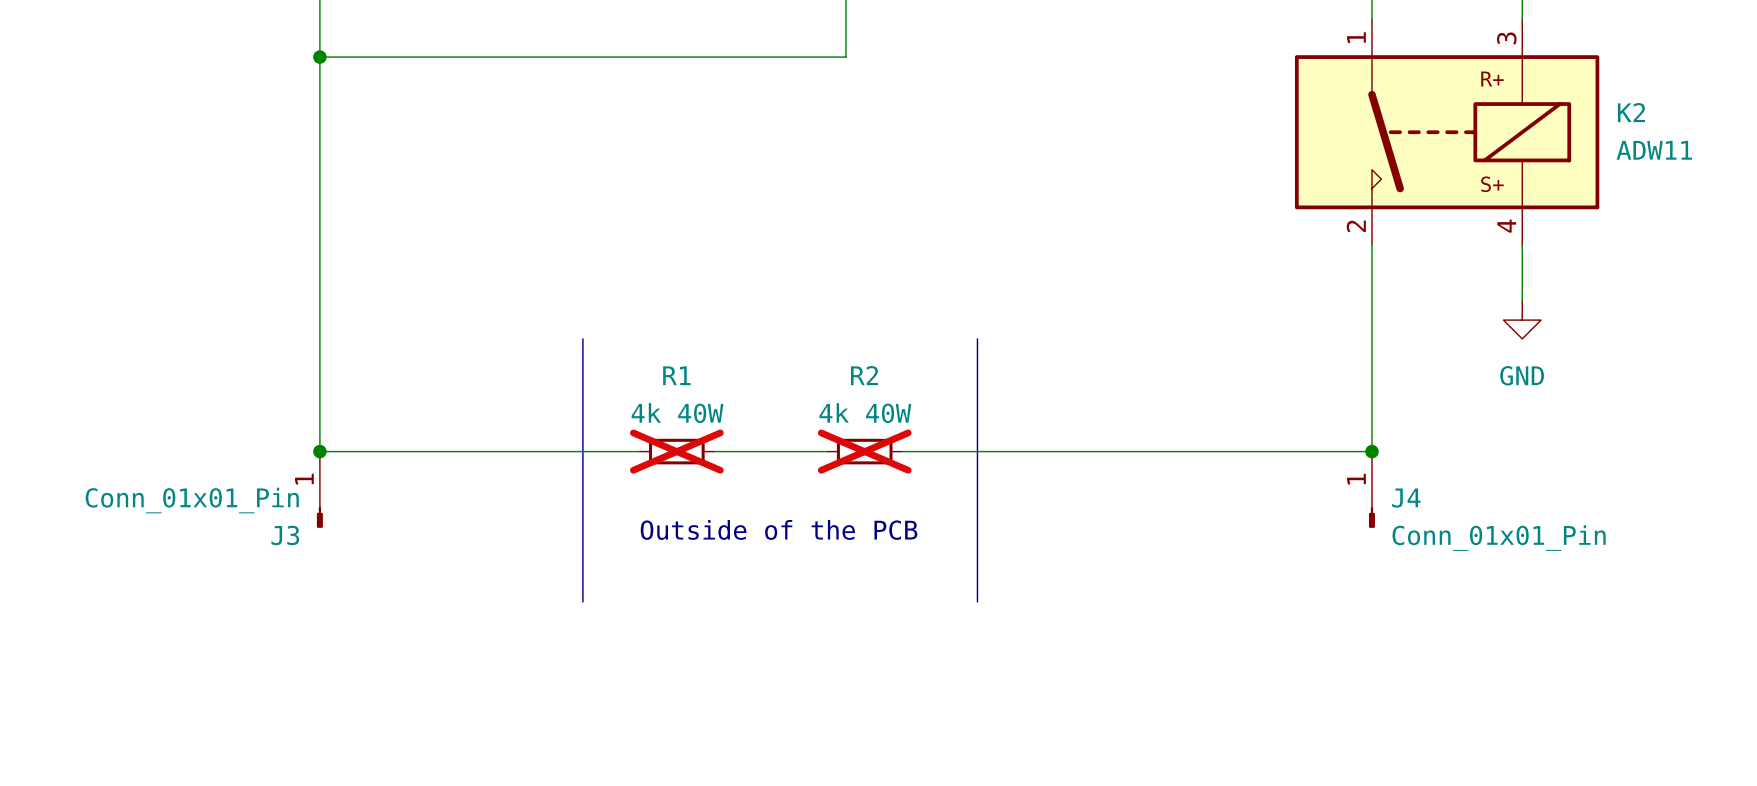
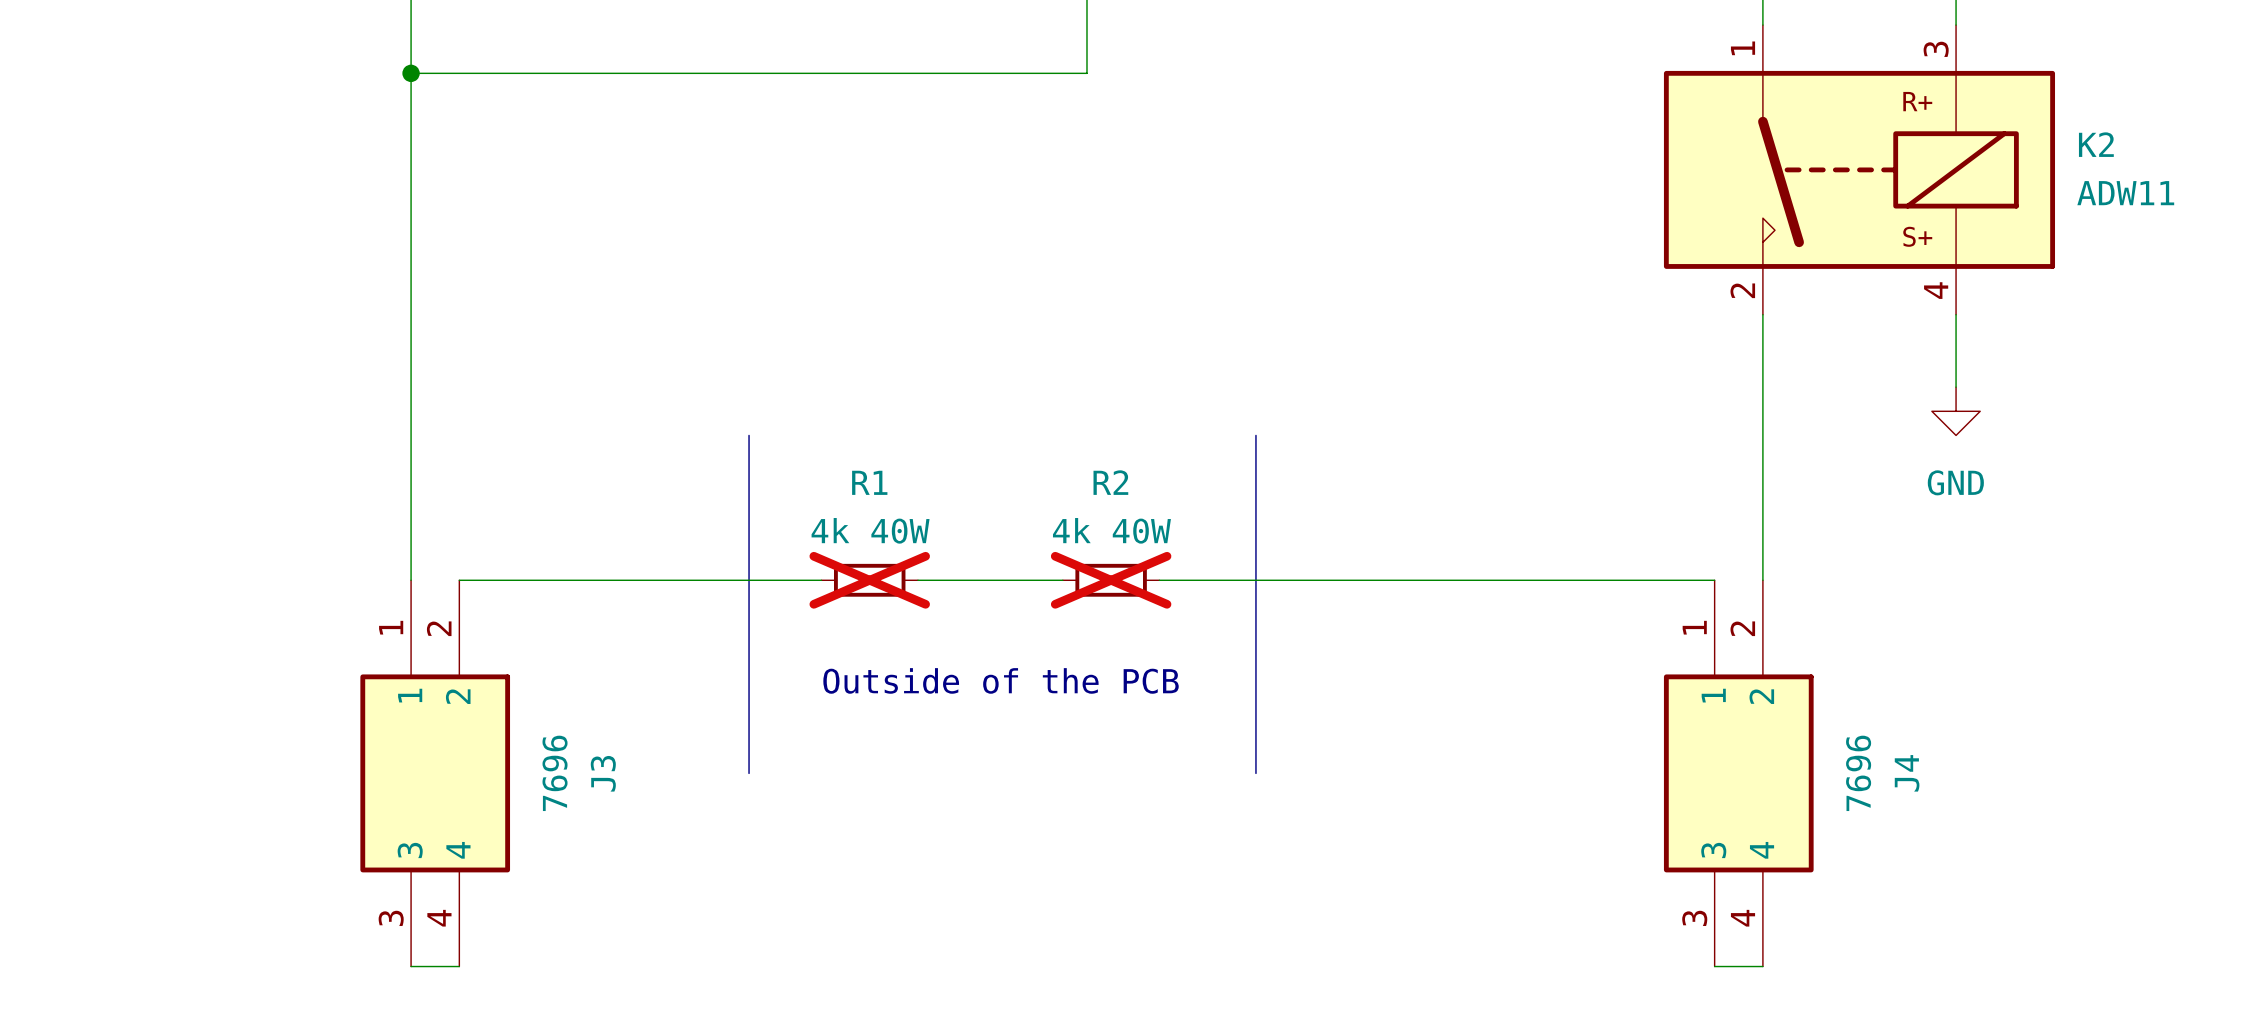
J3 symbol: [316, 451, 323, 528] -> [360, 580, 511, 967]
wire: (319, 451) (357, 451) -> (411, 966) (459, 966)
junction: (319, 451) -> none
wire: (1334, 451) (1371, 451) -> (1714, 966) (1762, 966)
J4 symbol: [1368, 451, 1375, 528] -> [1663, 580, 1814, 967]
junction: (1371, 451) -> none
J4 name position: J4 (1406, 498) -> J4 (1907, 773)
J3 value: Conn_01x01_Pin (192, 500) -> 7696 (555, 773)
J3 name position: J3 (285, 535) -> J3 (603, 773)
J4 value: Conn_01x01_Pin (1499, 538) -> 7696 (1858, 773)

